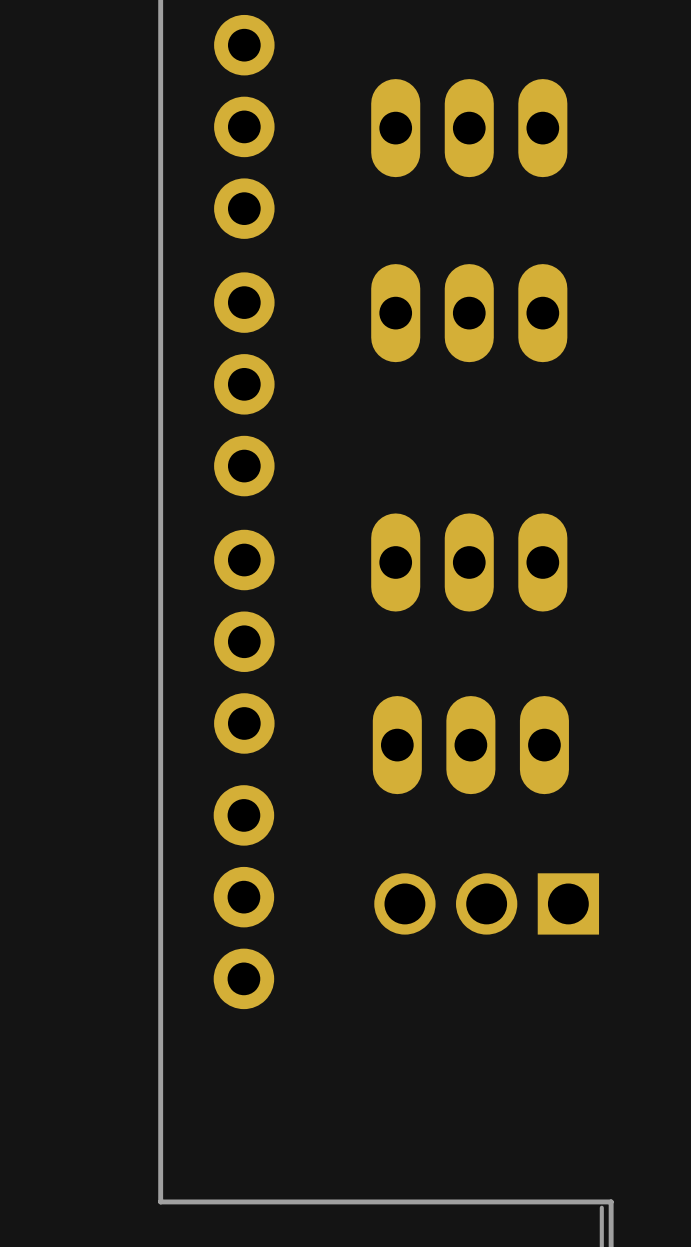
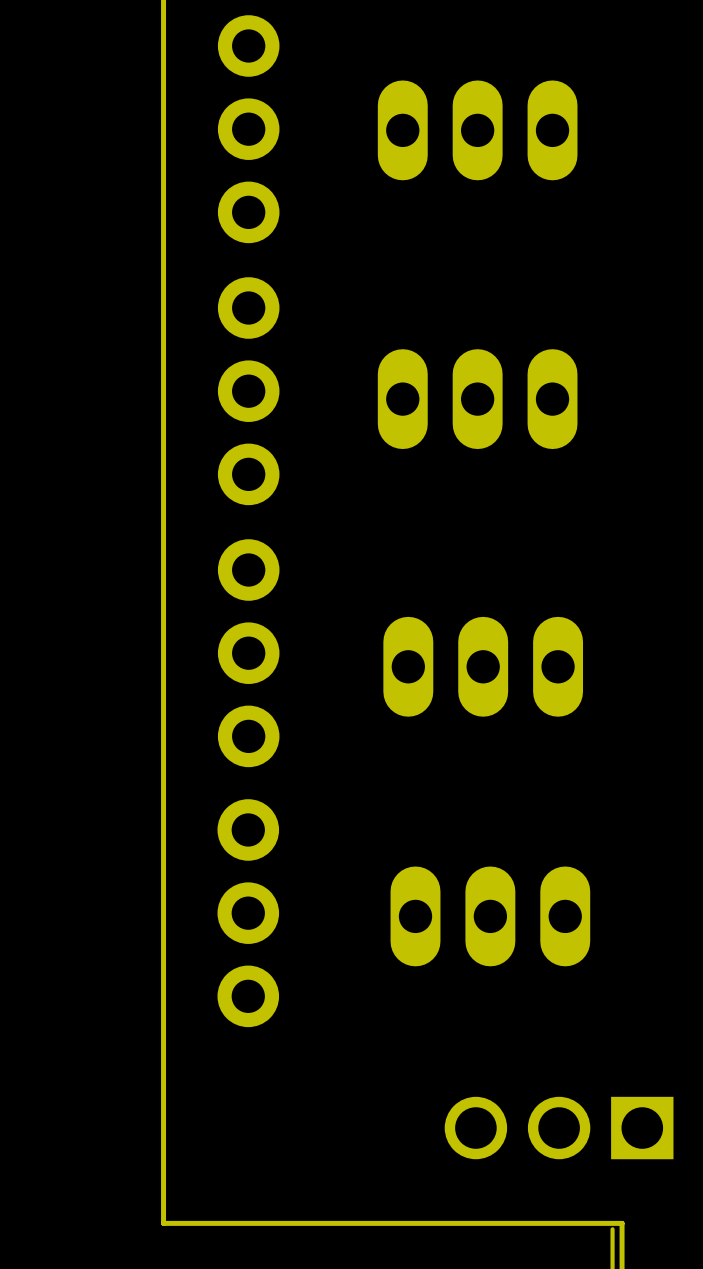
part position: (469, 313) -> (477, 399)
part: (469, 562) -> none
part: none -> (483, 666)
part: (470, 745) -> none
part footprint: [374, 873, 600, 935] -> [390, 866, 591, 967]
part: none -> (559, 1128)

